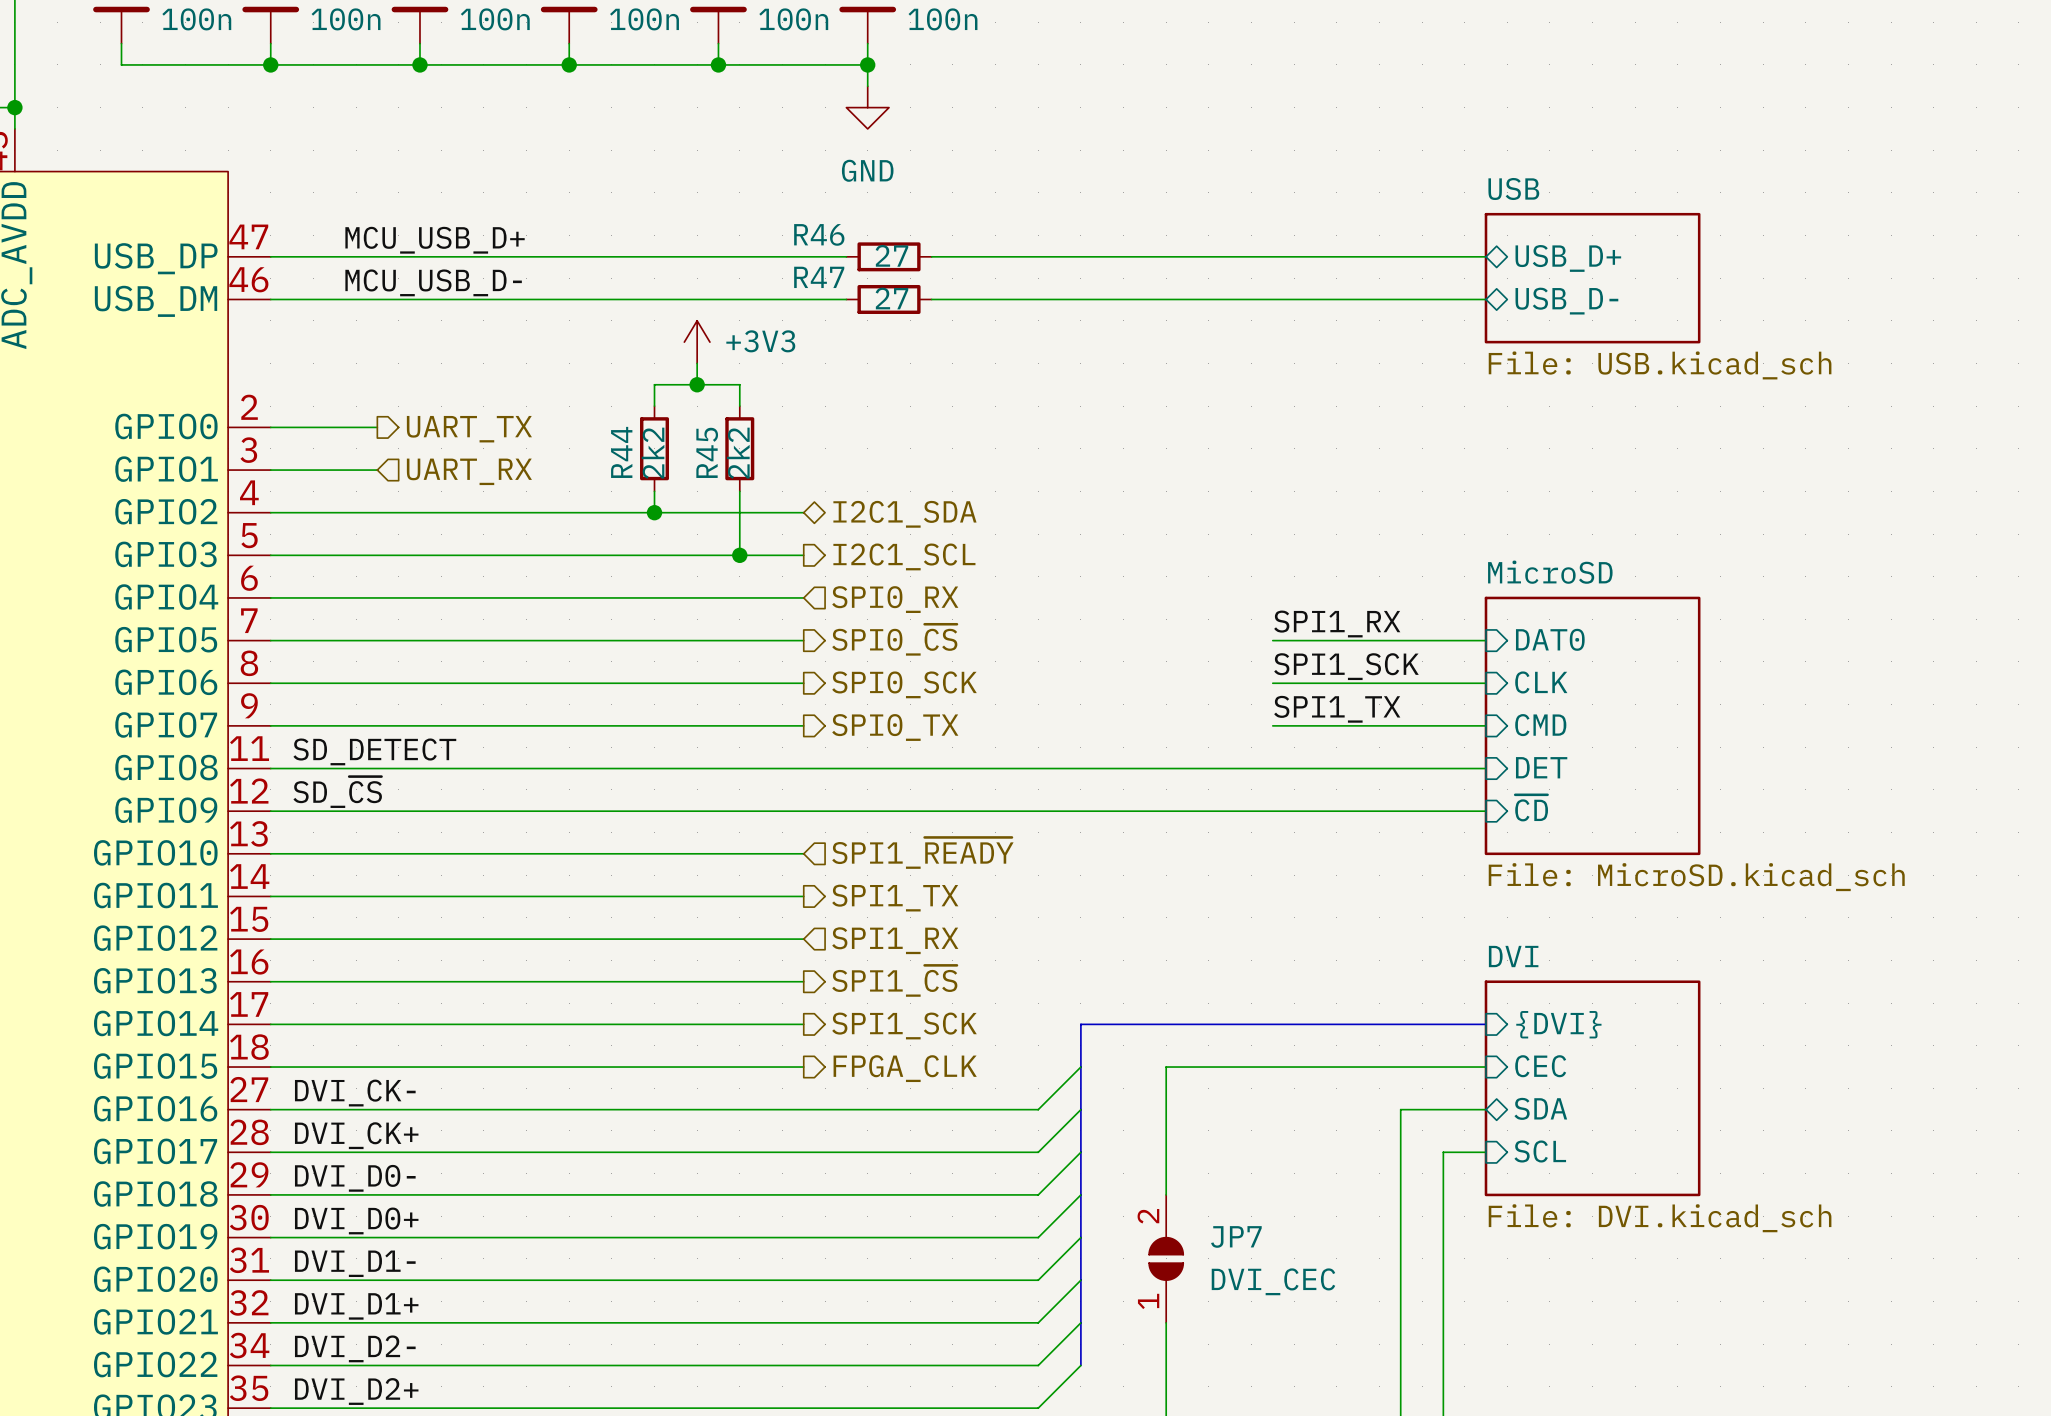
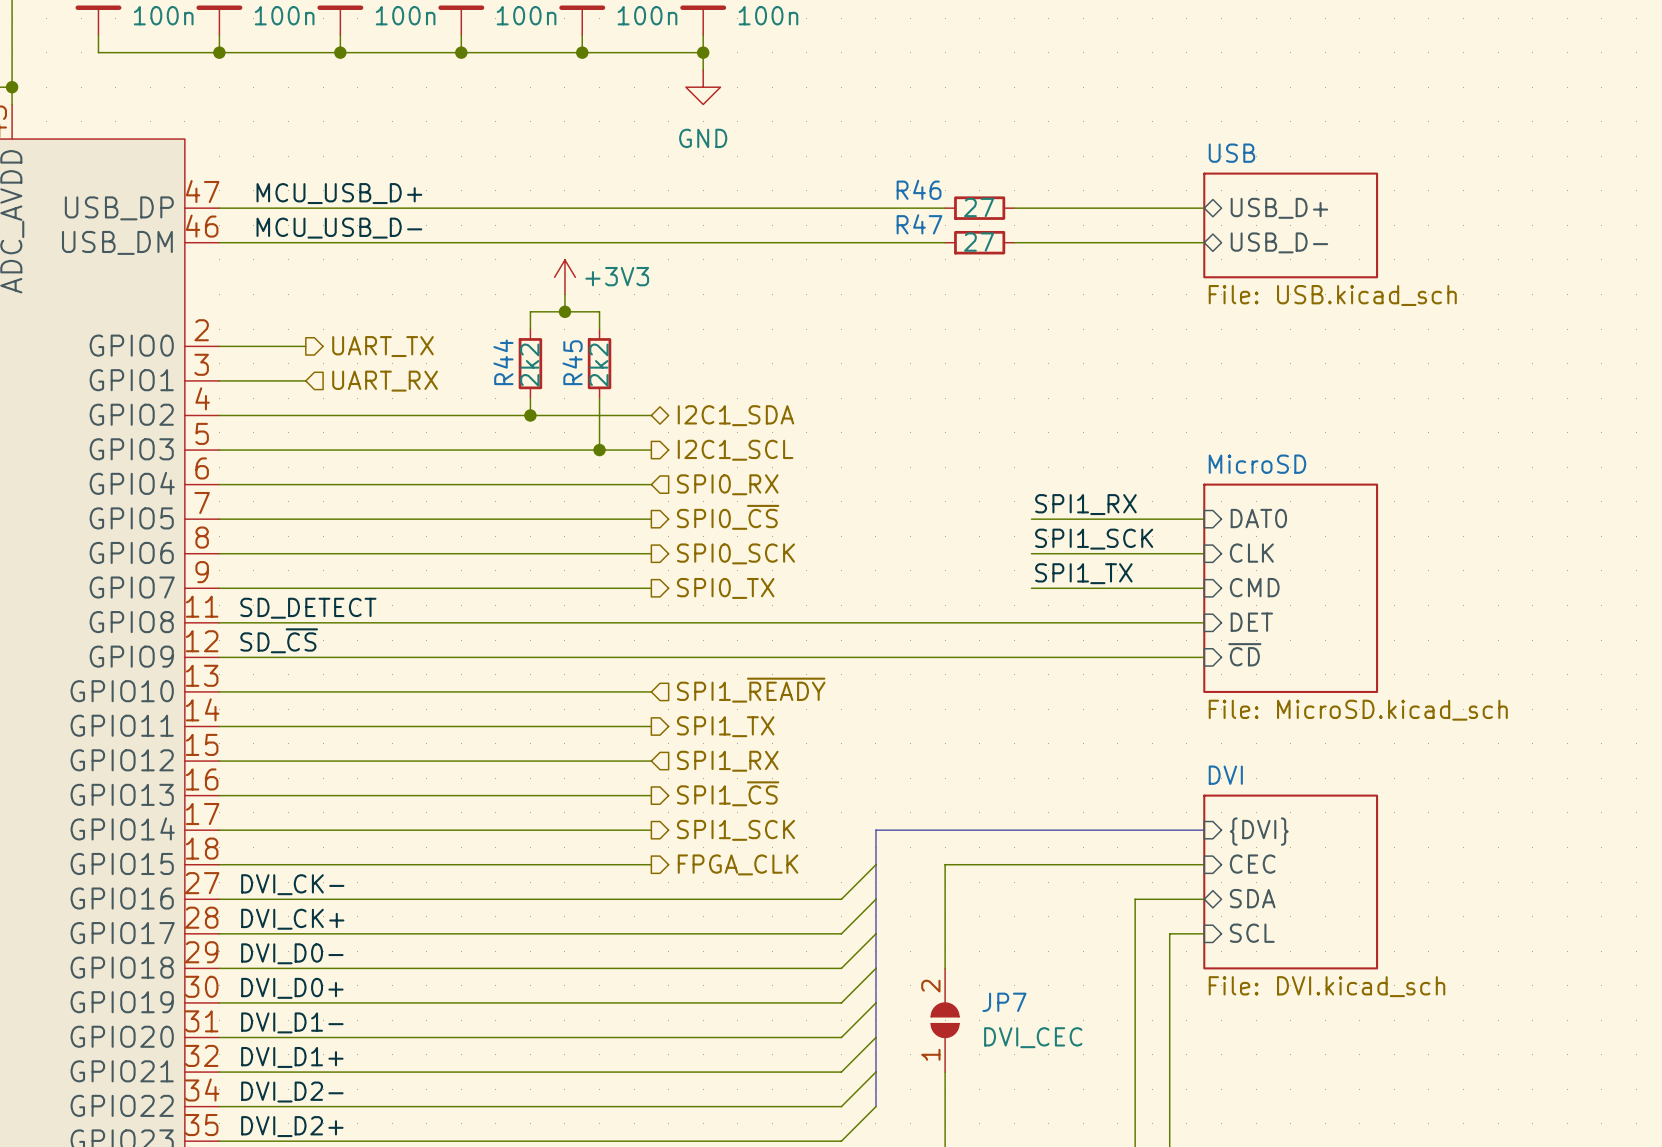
R46 position: (889, 256) -> (979, 208)
wire: (1166, 256) (1251, 256) -> (685, 208) (755, 208)
R47 position: (889, 299) -> (979, 242)
wire: (1166, 299) (1251, 299) -> (685, 242) (755, 242)

